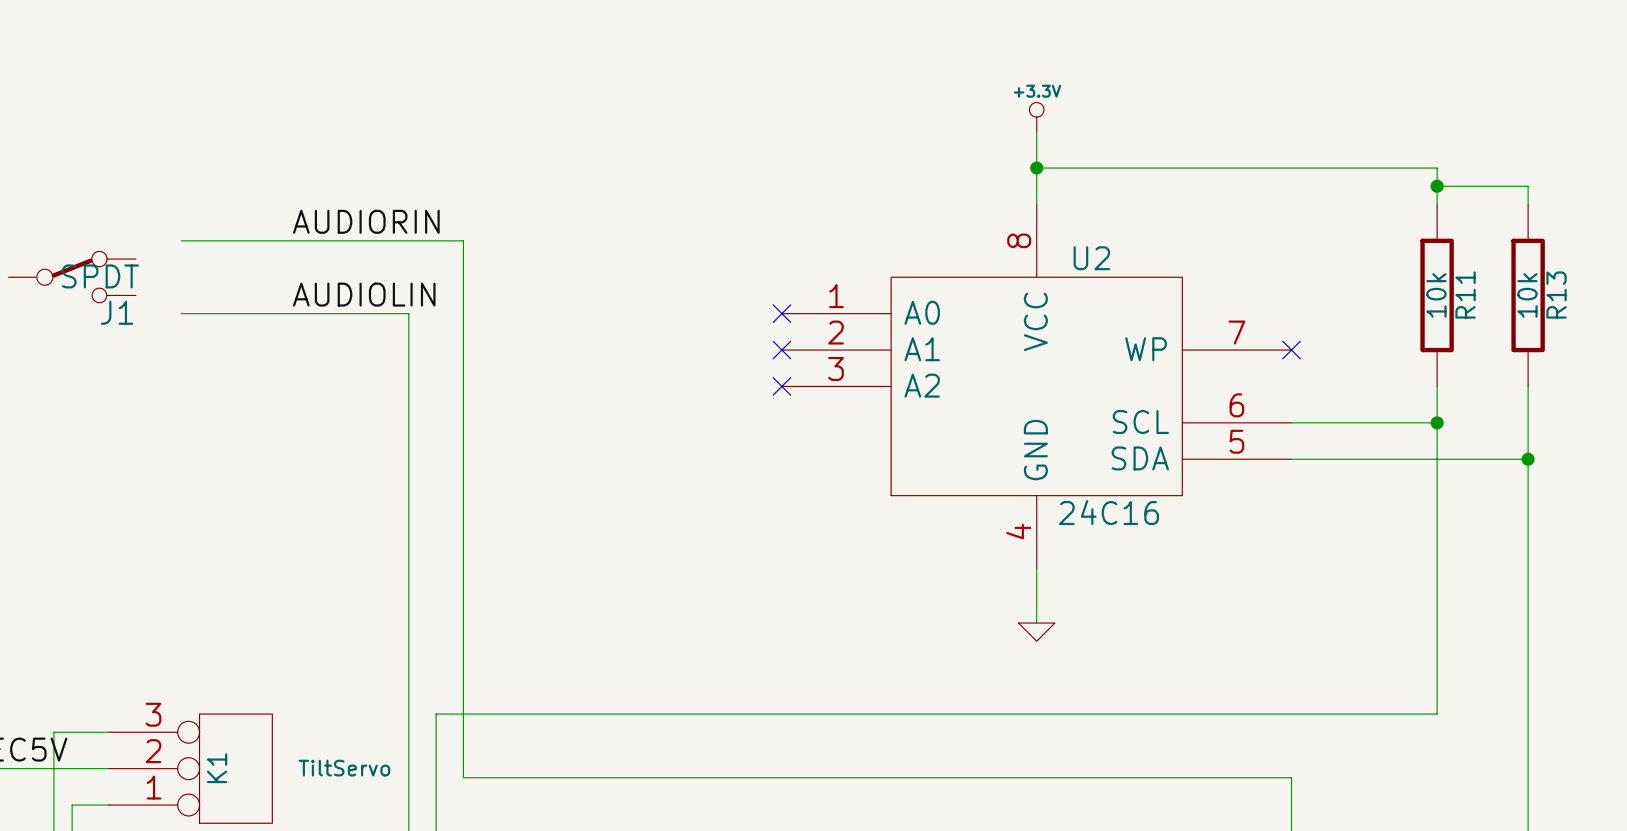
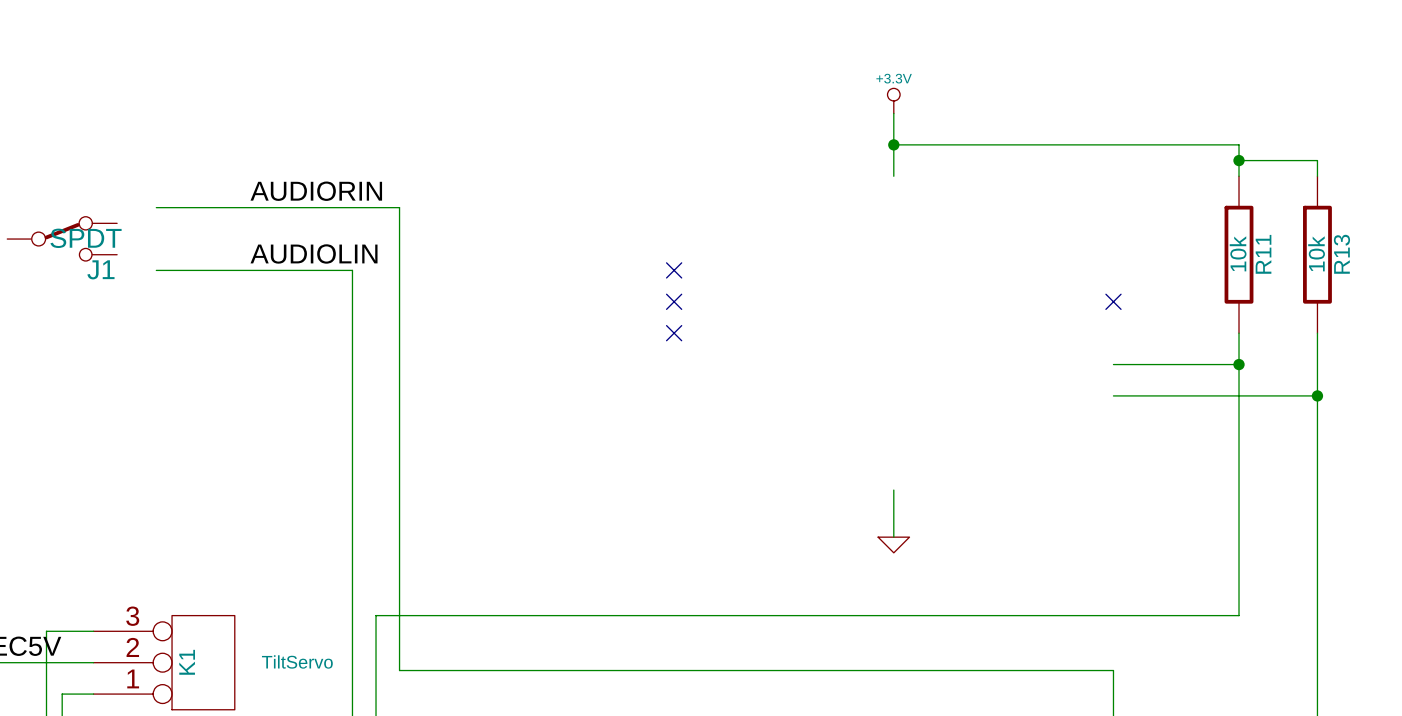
U2: 24C16 (1036, 386) -> none

